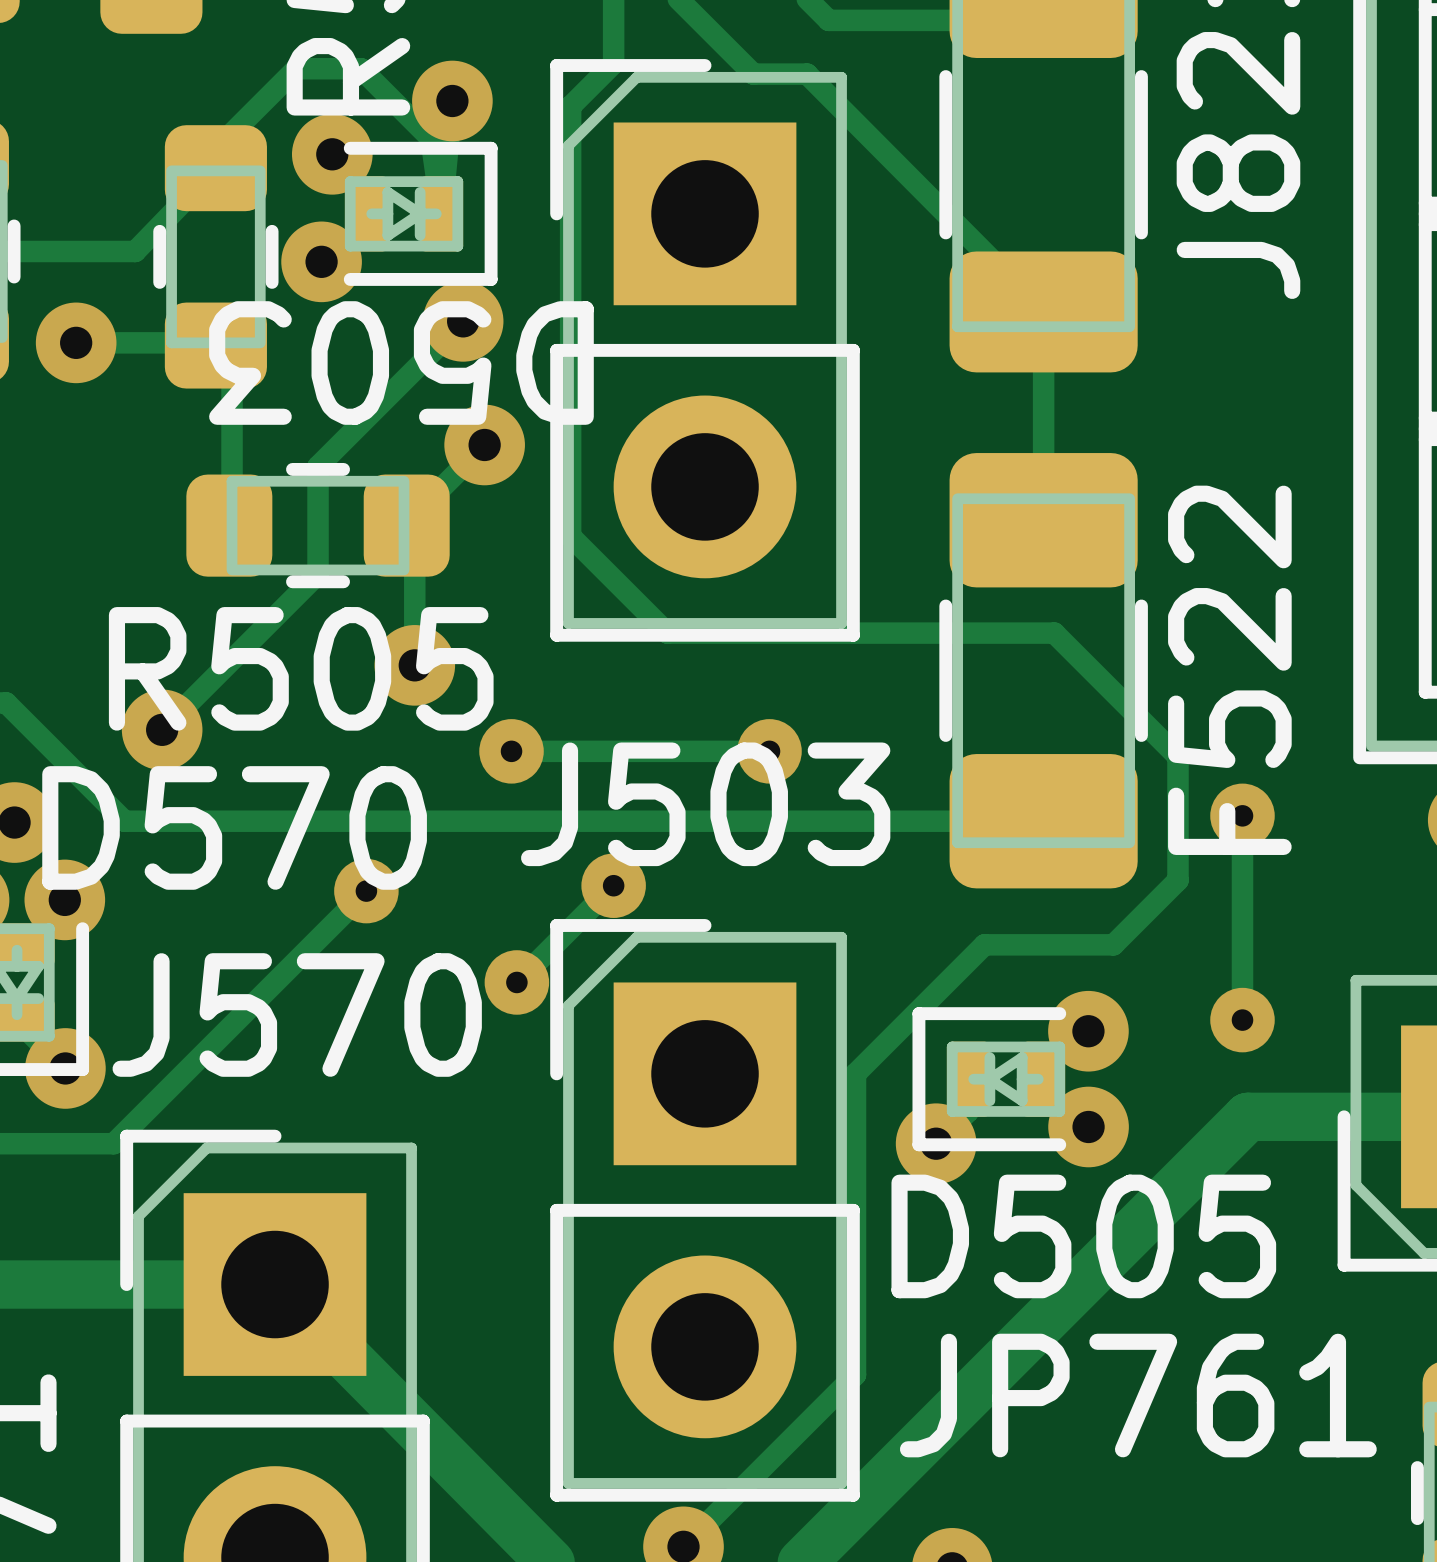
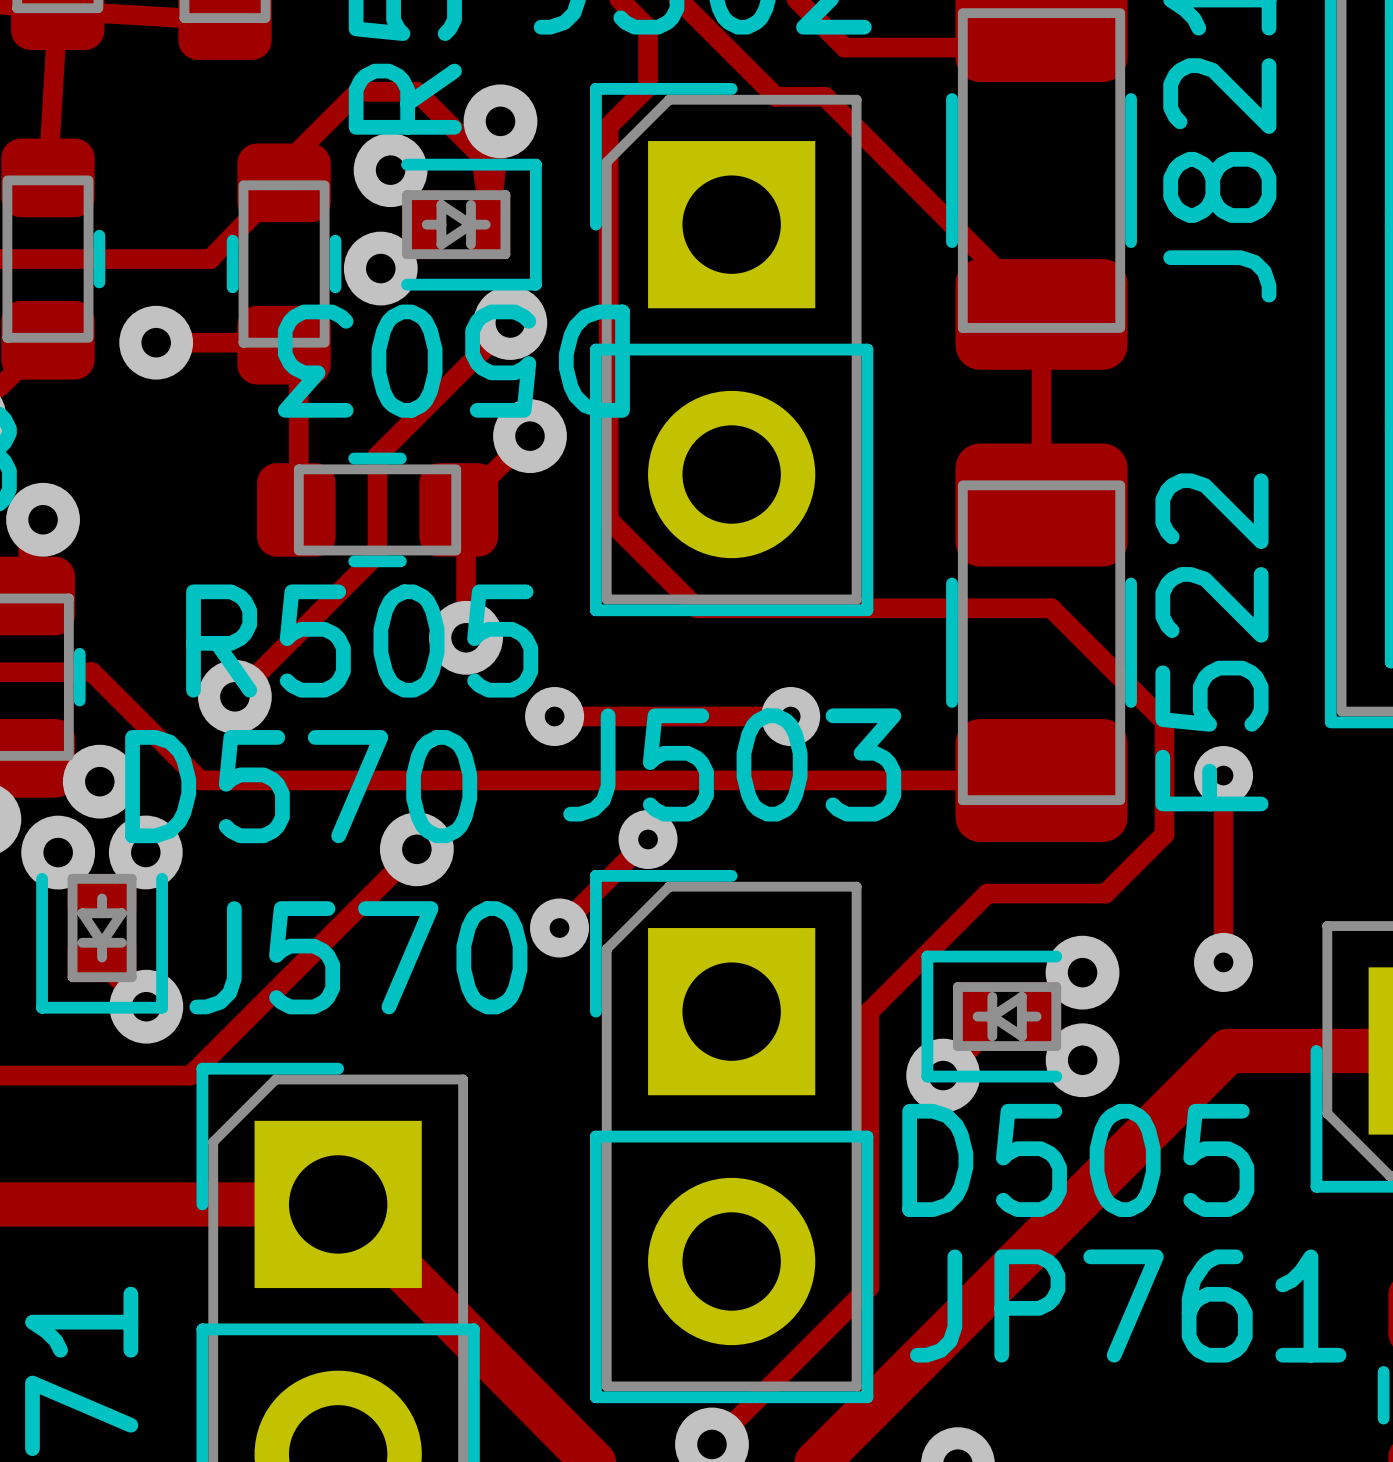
via size: [334, 858, 399, 924] -> [379, 812, 454, 887]

